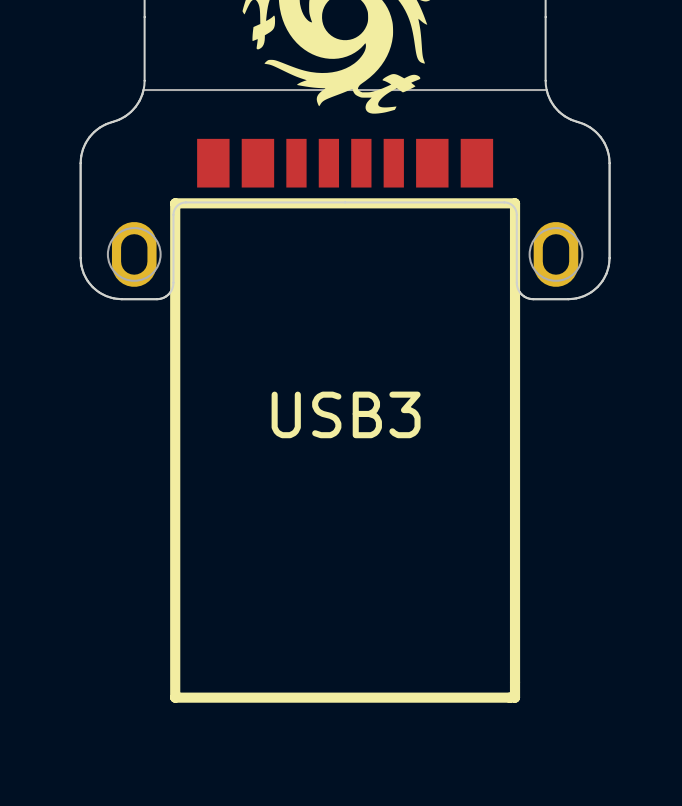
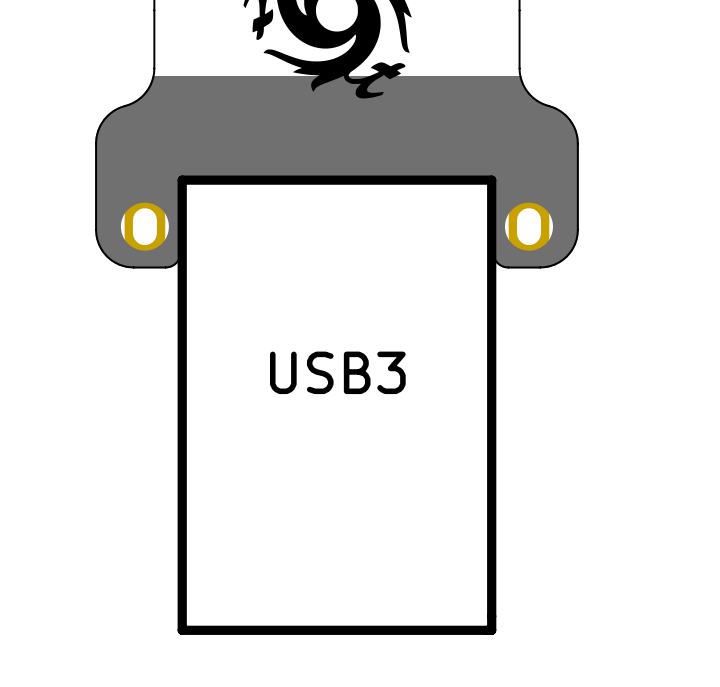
drawing: none -> [96, 76, 578, 268]
drawing: [106, 227, 162, 282] -> none
drawing: [528, 227, 584, 282] -> none

